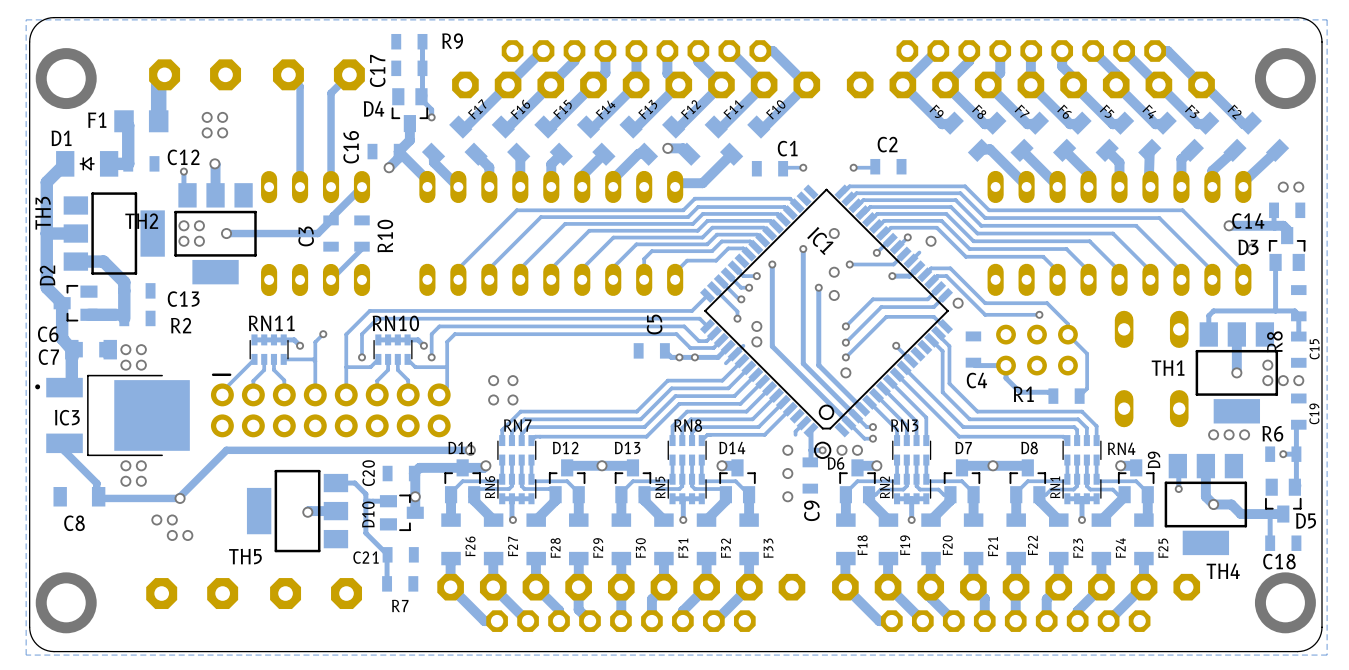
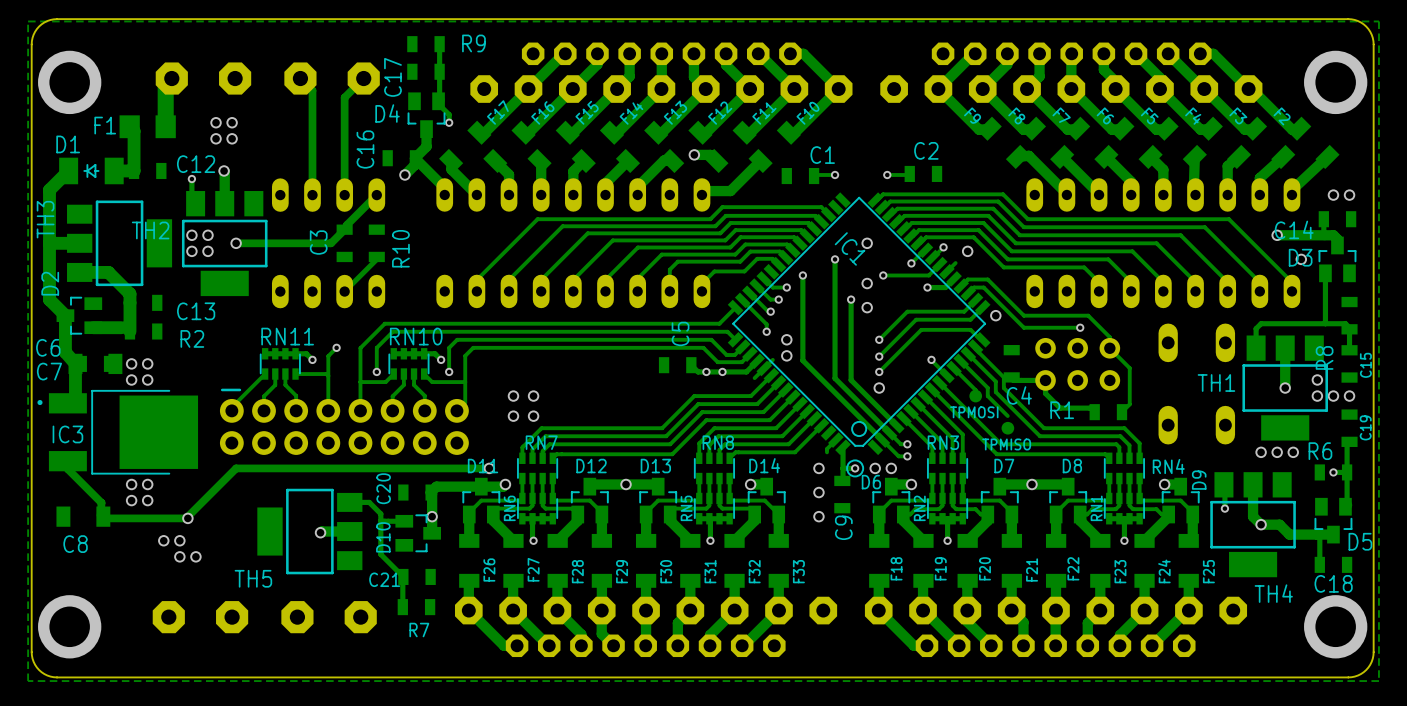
track: (949, 346) (949, 383) (977, 411) (1004, 411) -> (986, 360) (1003, 377) (1003, 388) (1044, 428)
track: none -> (961, 361) (987, 387) (987, 396) (1007, 416)
track: (942, 351) (942, 392) (969, 419) (1000, 419) -> (979, 365) (995, 381) (995, 392) (1040, 436)
track: none -> (954, 368) (975, 390) (975, 396)
TPMOSI: none -> (975, 396)
TPMISO: none -> (1007, 428)

